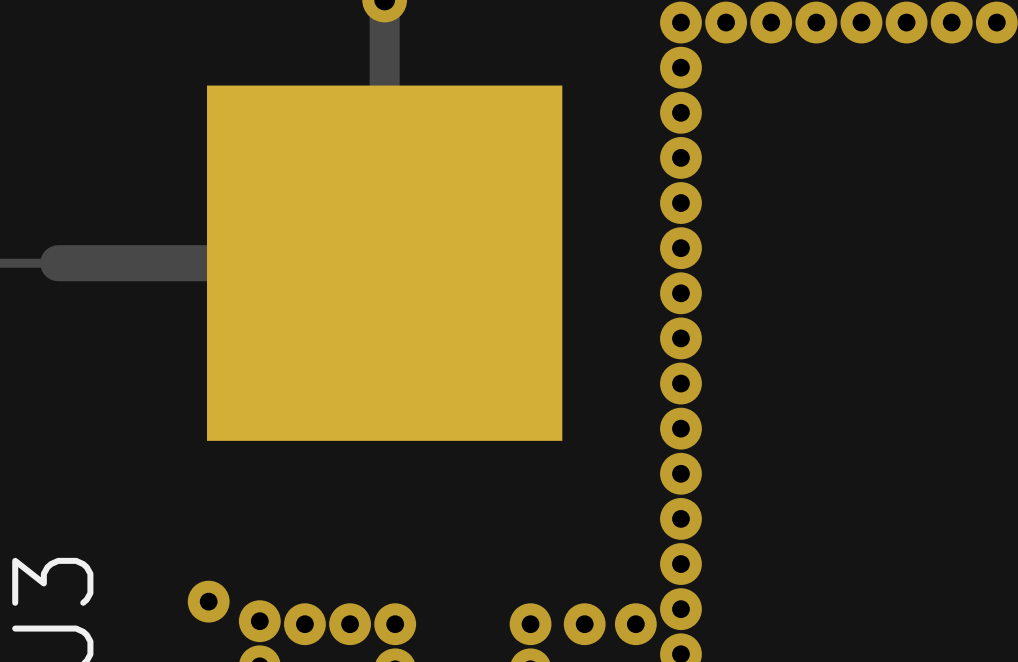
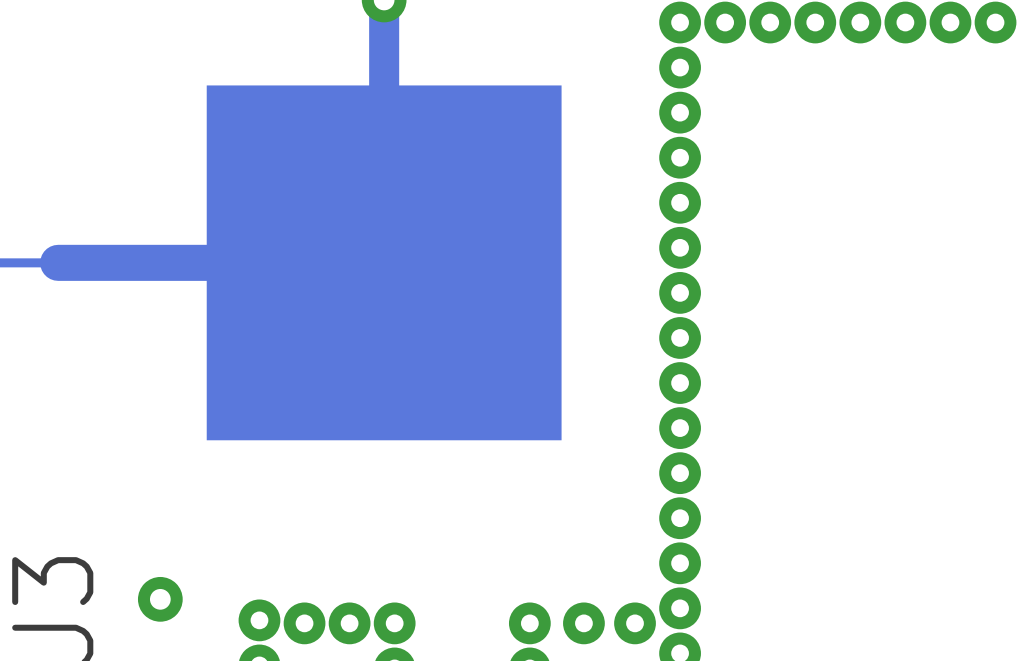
via: none -> (160, 599)
via: (208, 601) -> none

